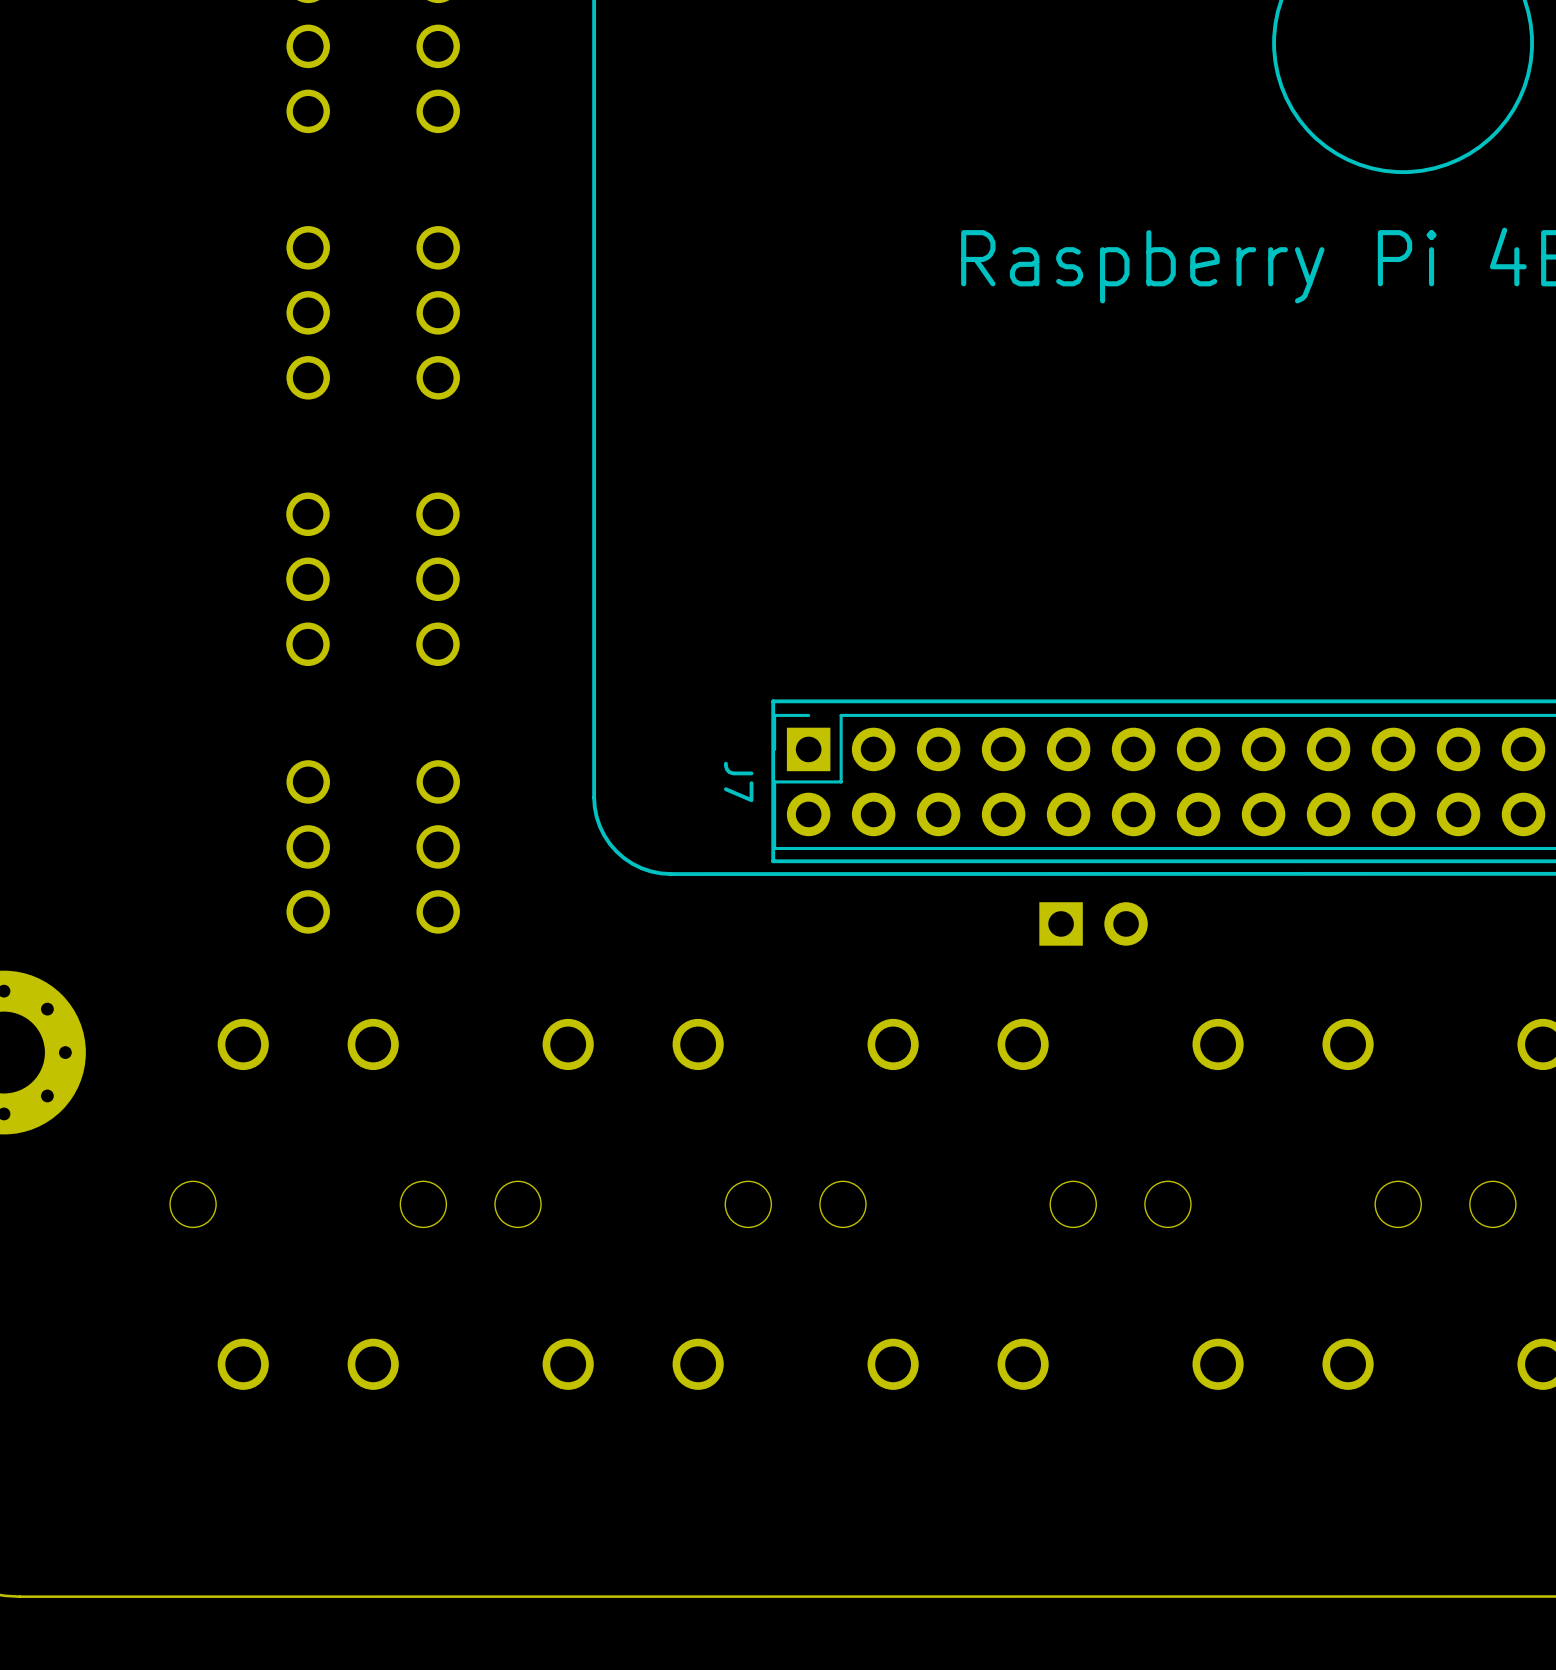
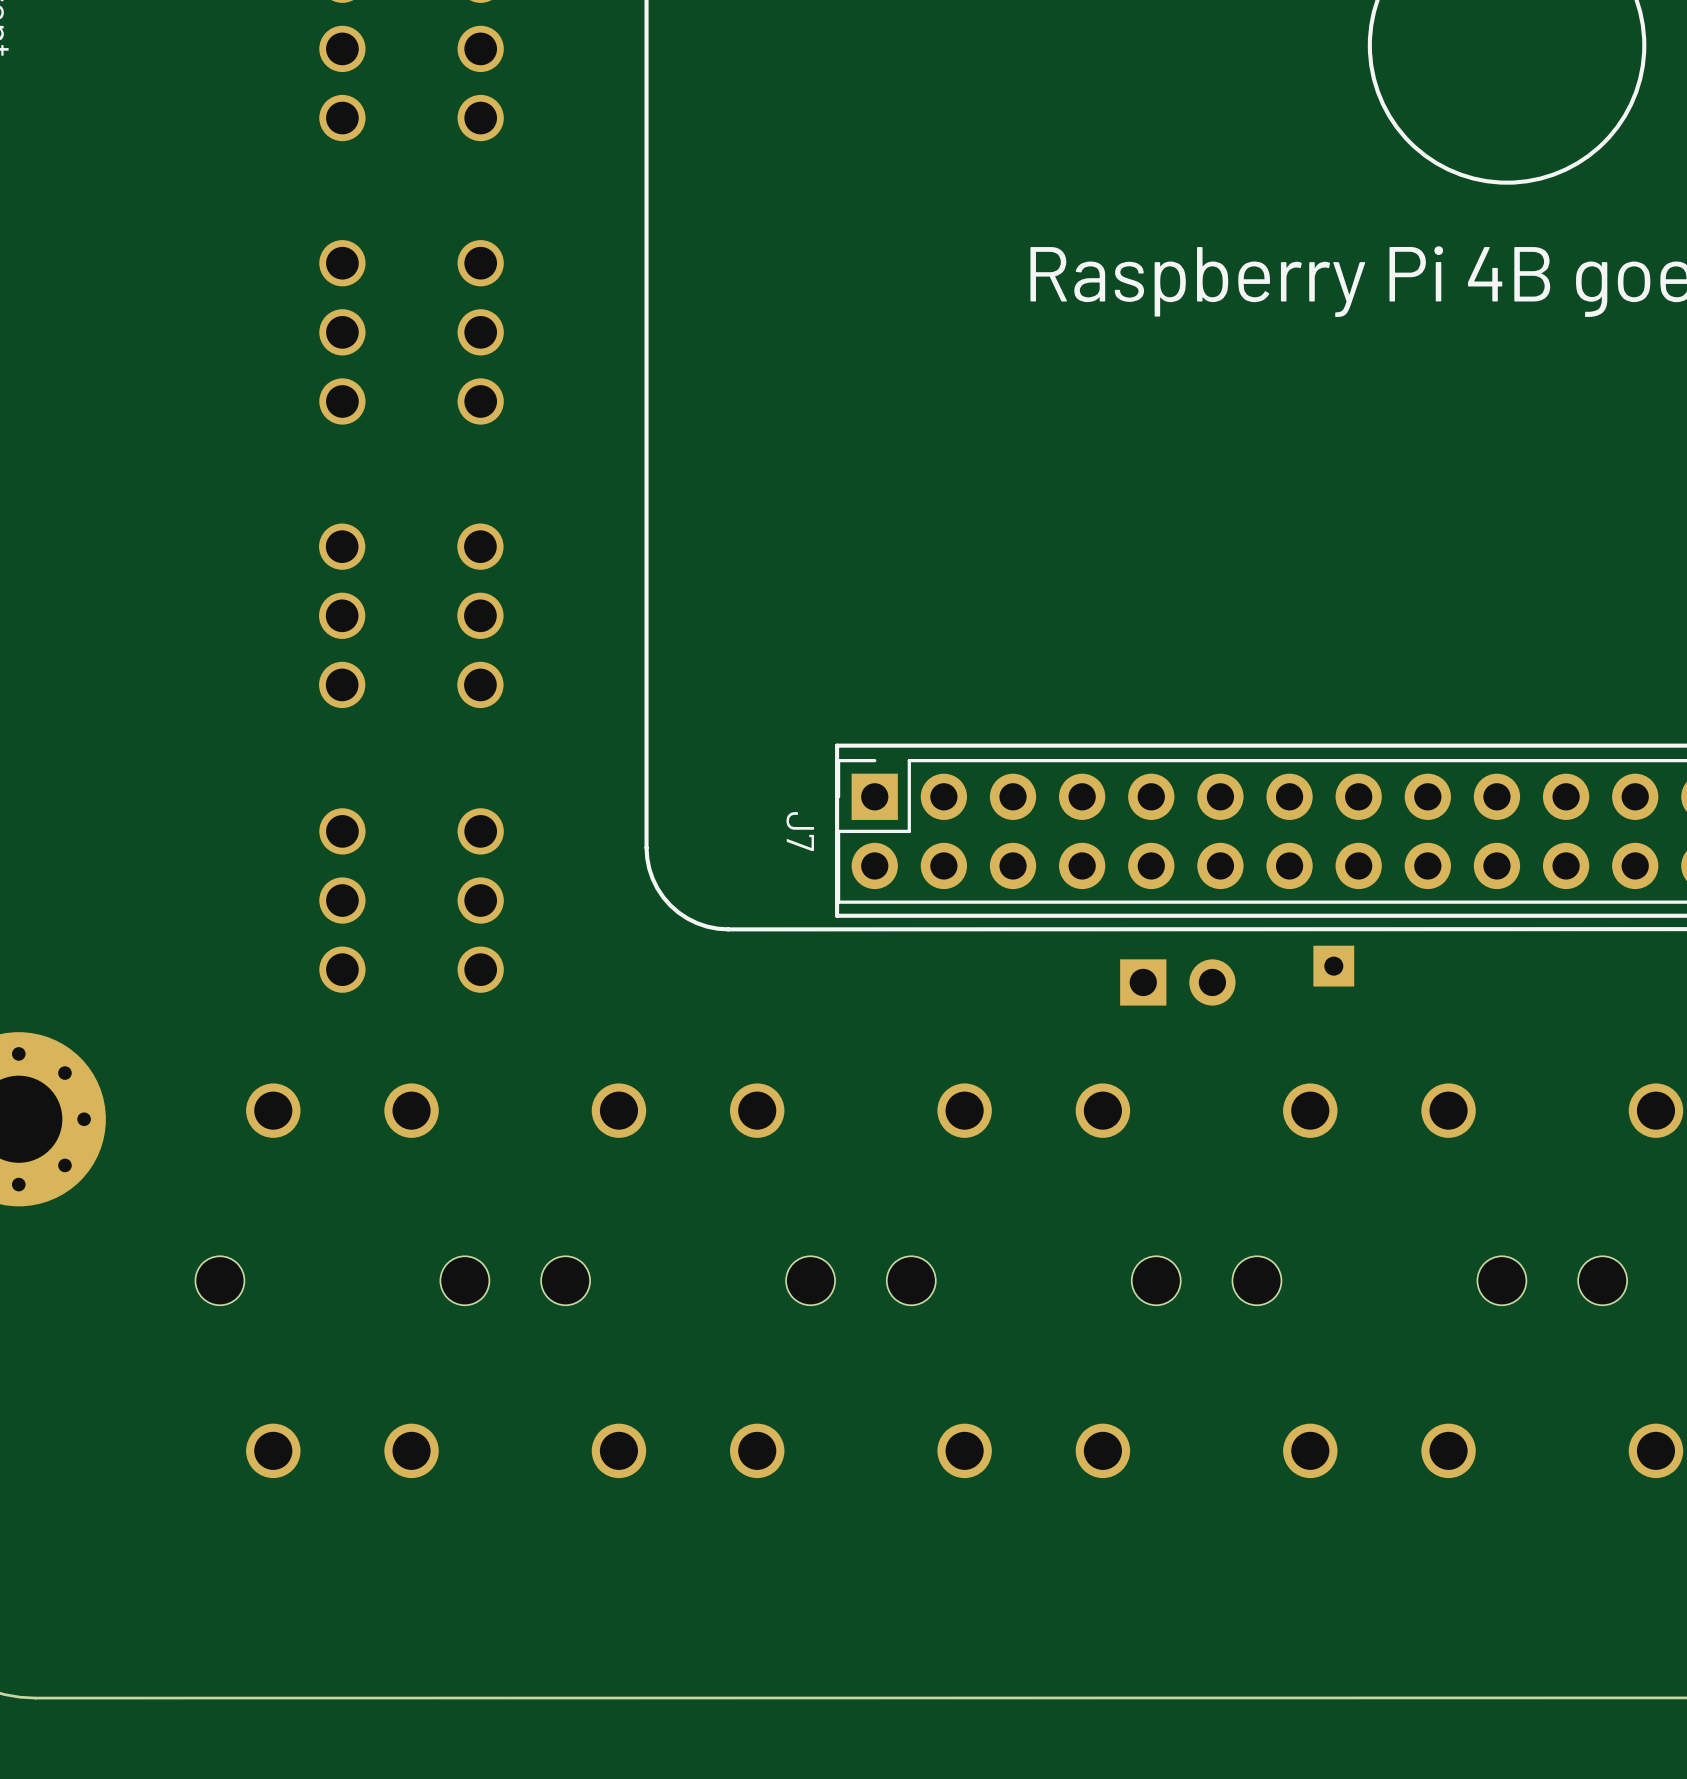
part: none -> (1333, 966)

